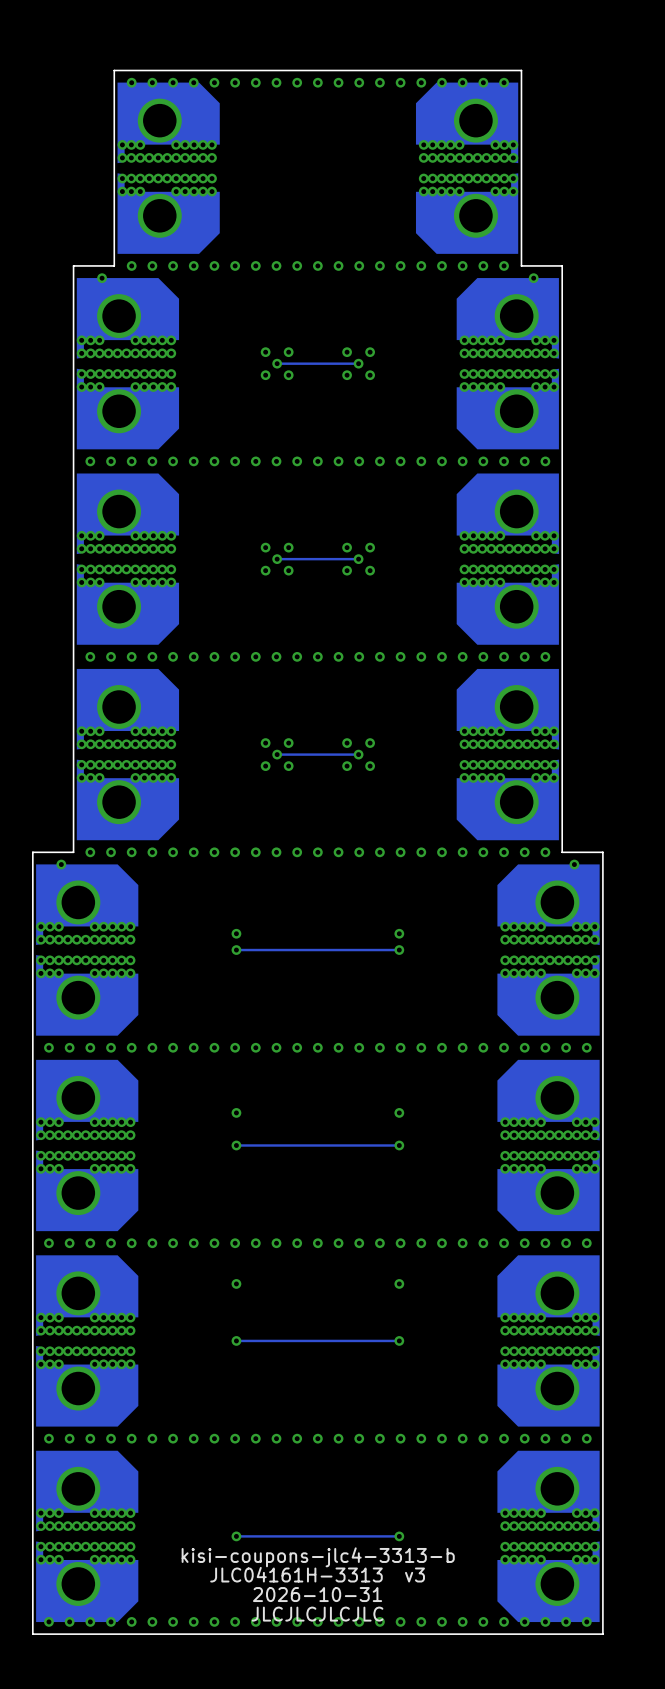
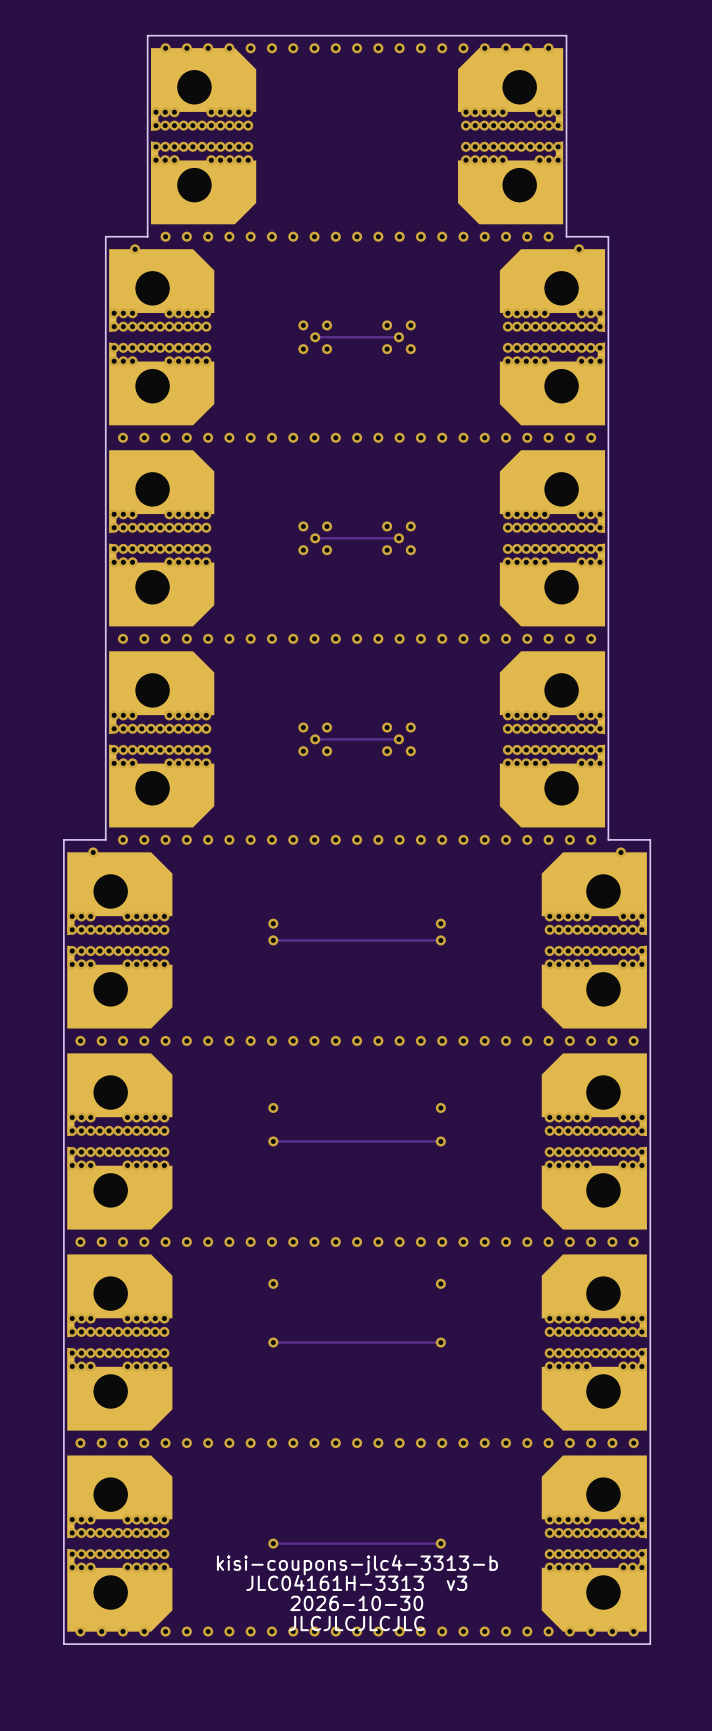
text: 2026-10-31 (317, 1594) -> 2026-10-30 (356, 1603)

